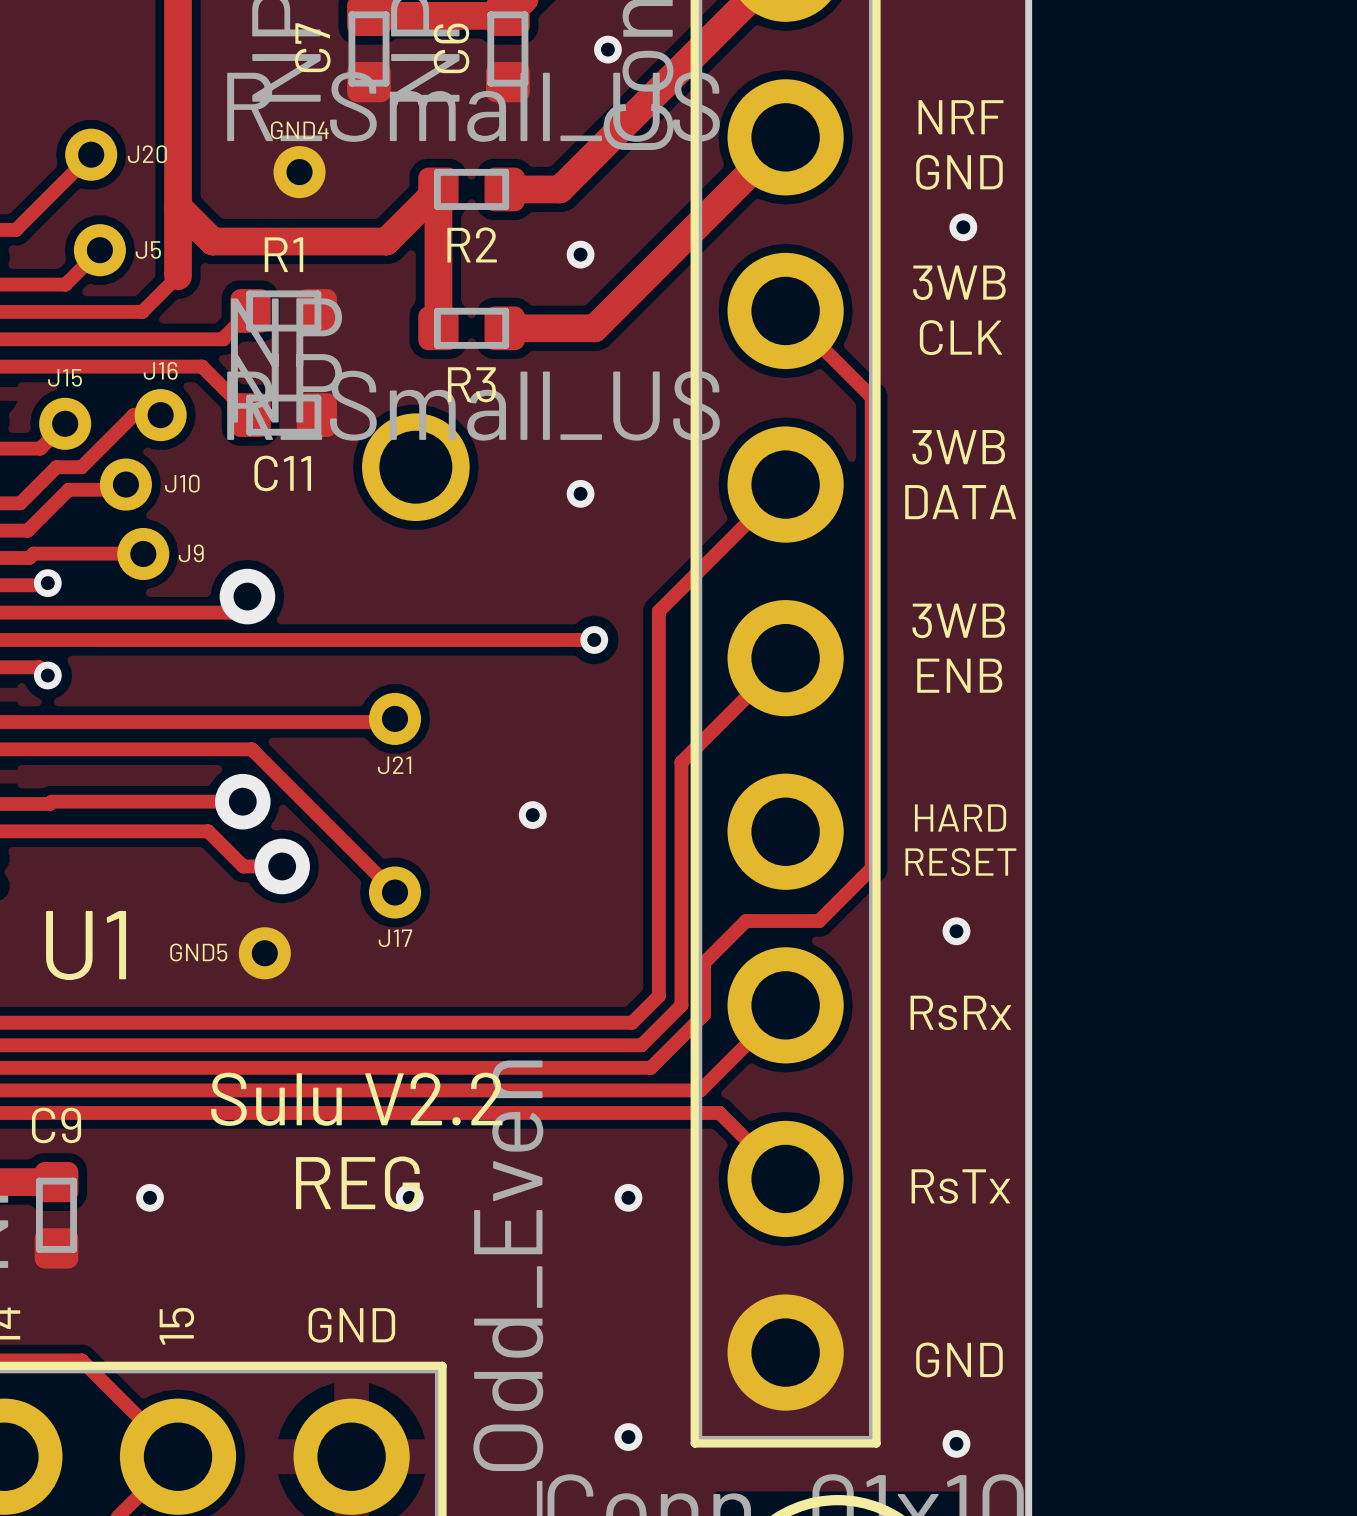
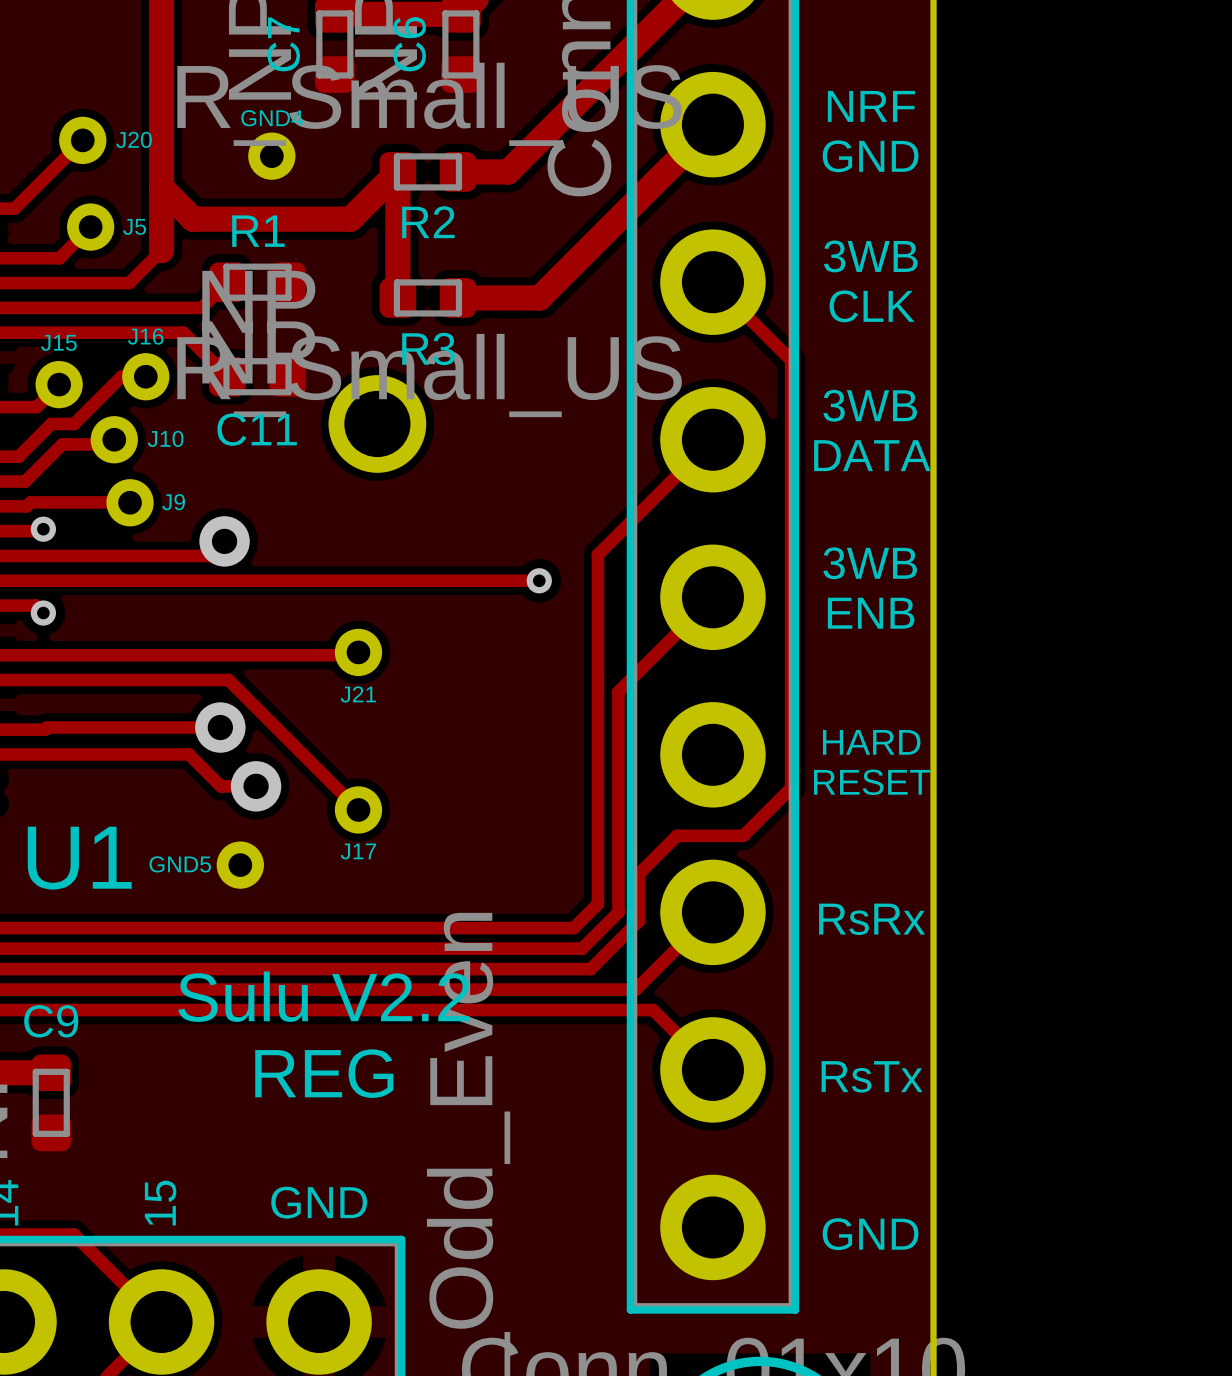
via: (607, 49) -> none
via: (963, 227) -> none
via: (580, 254) -> none
via: (580, 493) -> none
via: (532, 815) -> none
via: (956, 931) -> none
via: (149, 1197) -> none
via: (409, 1197) -> none
via: (628, 1197) -> none
via: (628, 1437) -> none
via: (956, 1443) -> none

